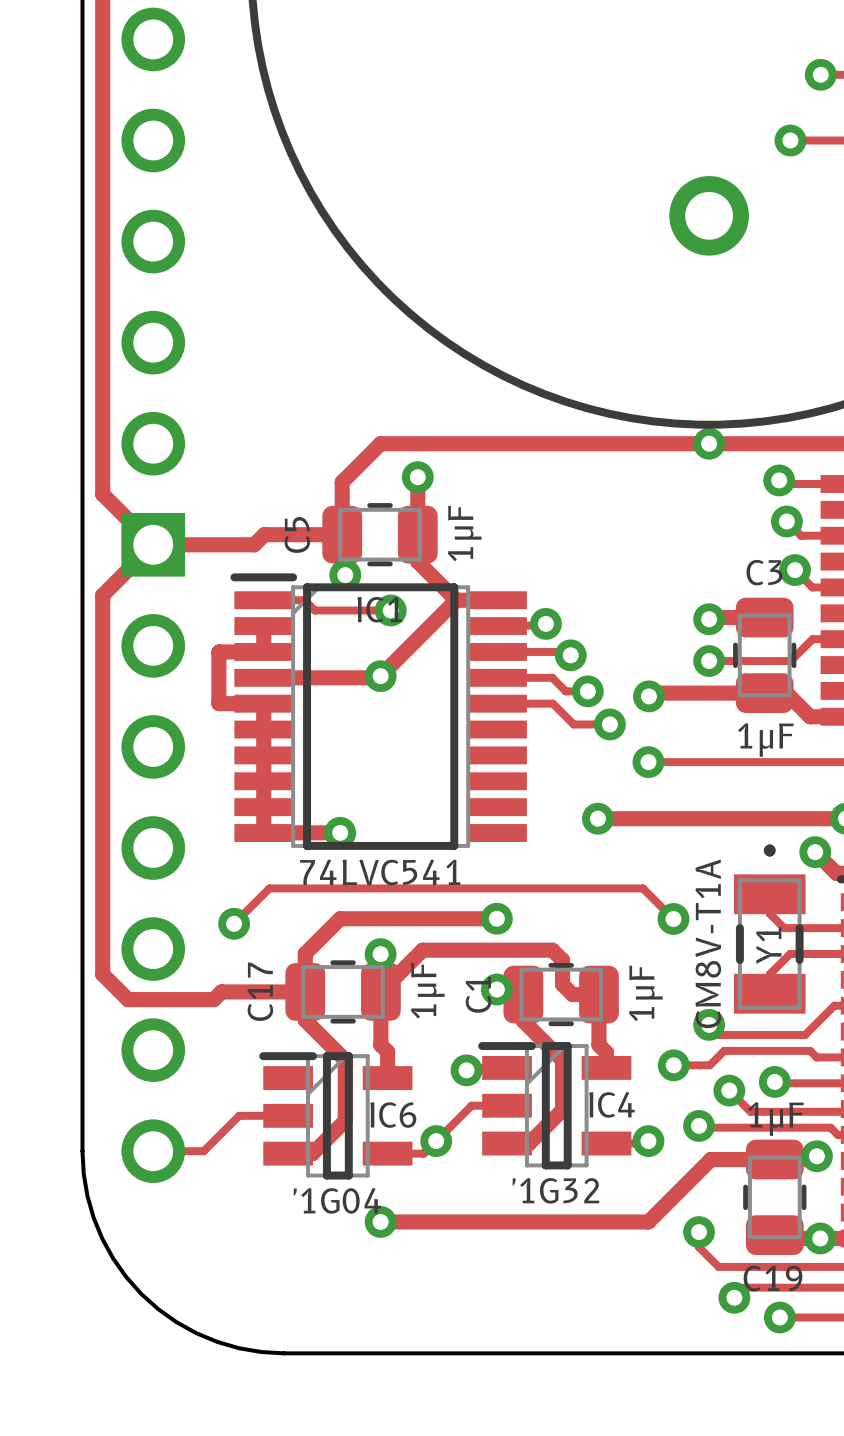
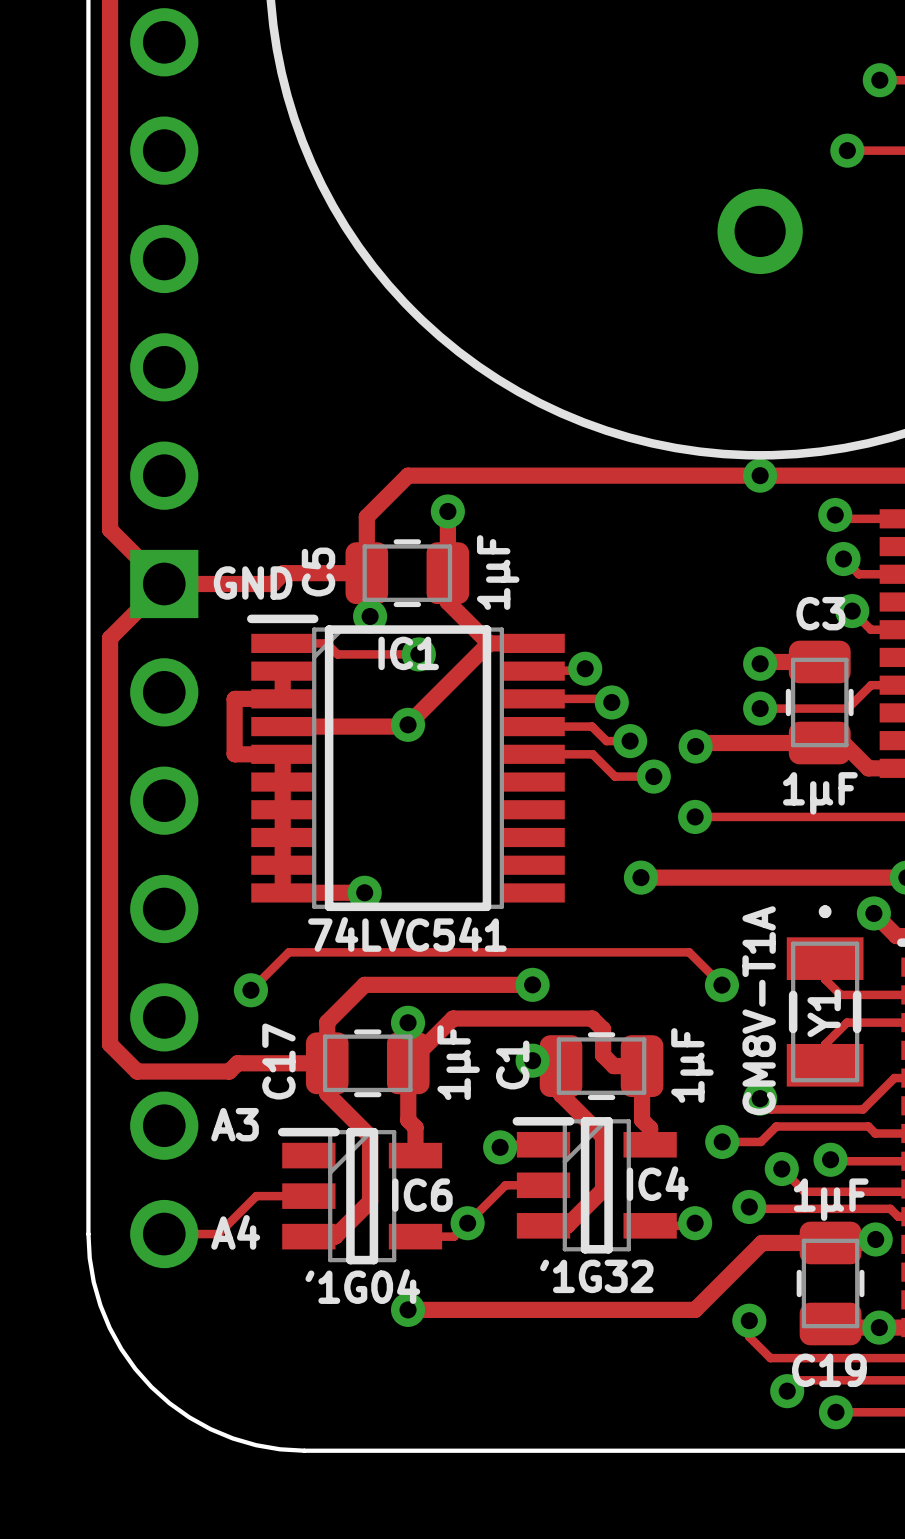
text: none -> GND (253, 582)
text: none -> A3 (235, 1124)
text: none -> A4 (235, 1232)

